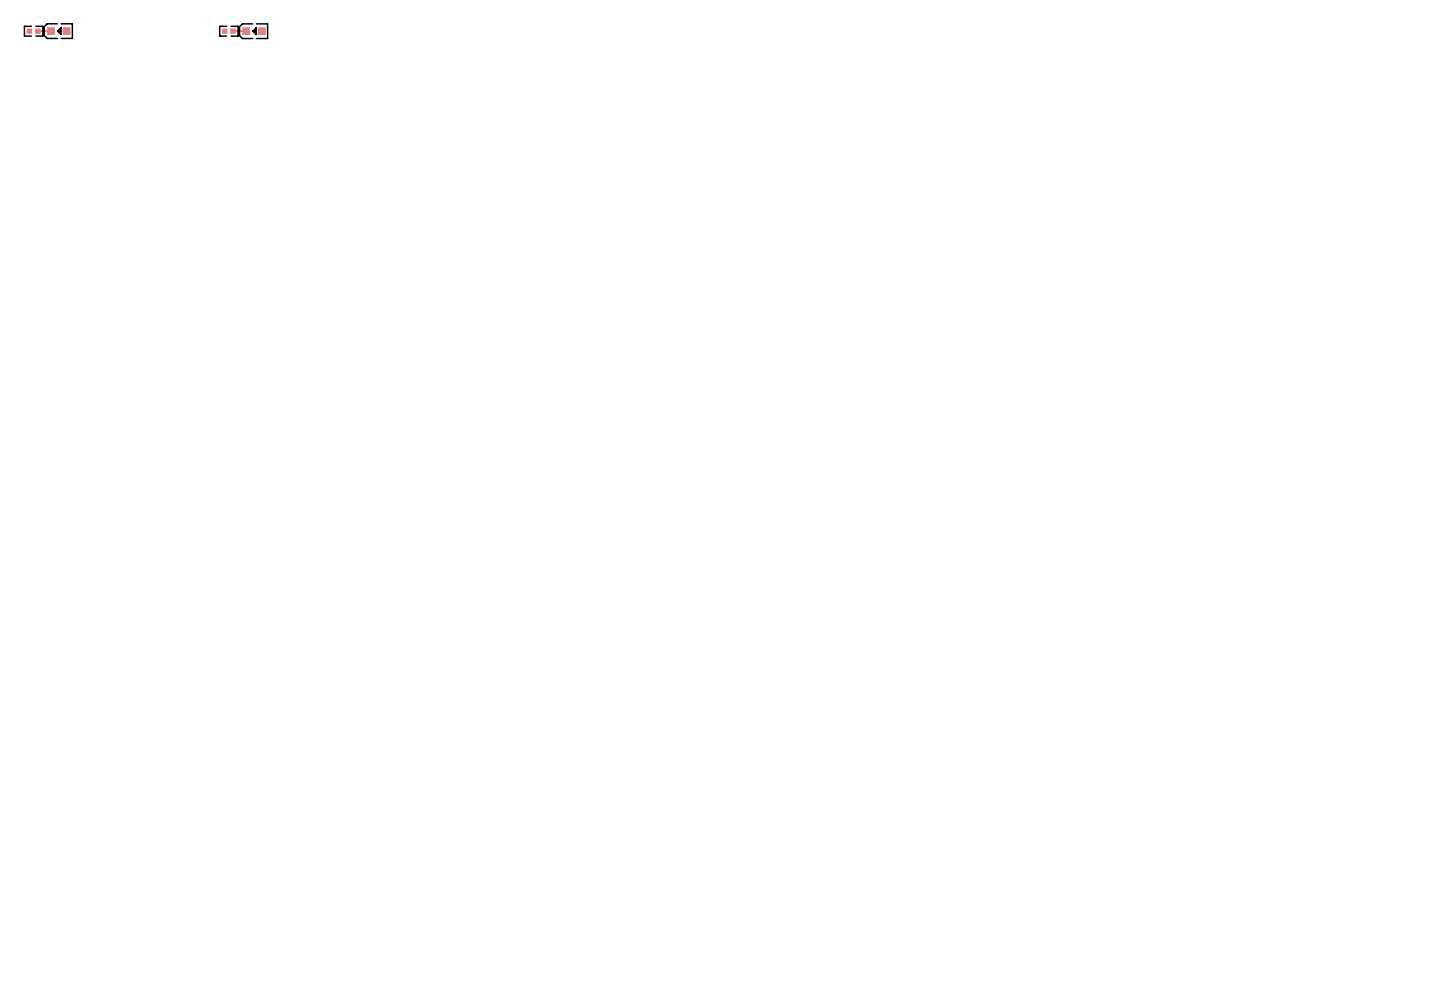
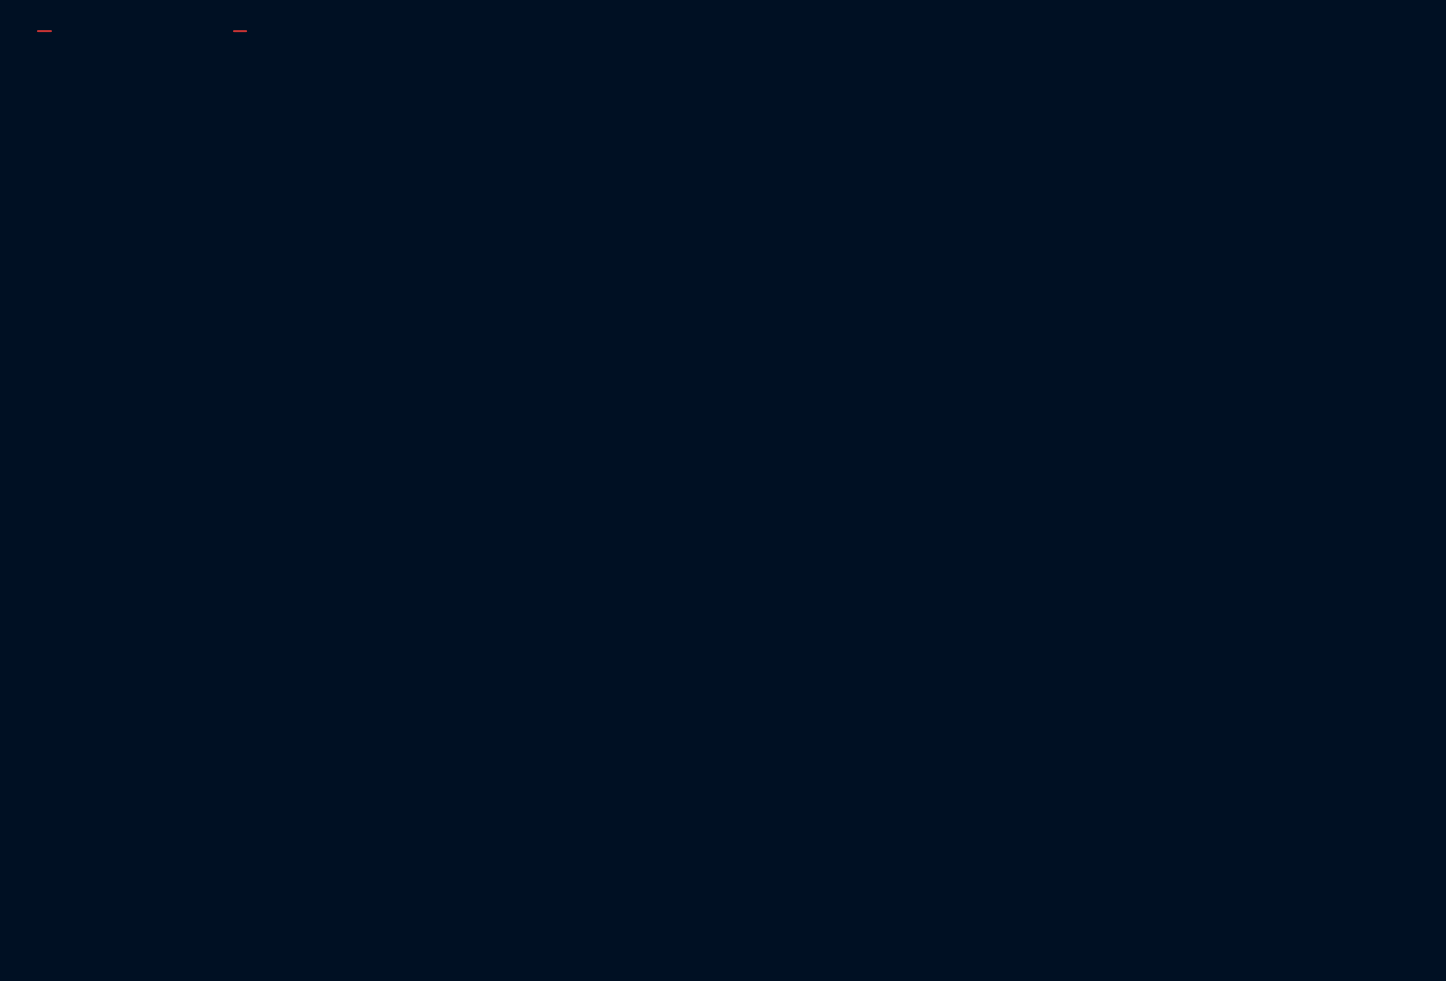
part: (33, 31) -> none
part: (58, 31) -> none
part: (228, 31) -> none
part: (253, 31) -> none

